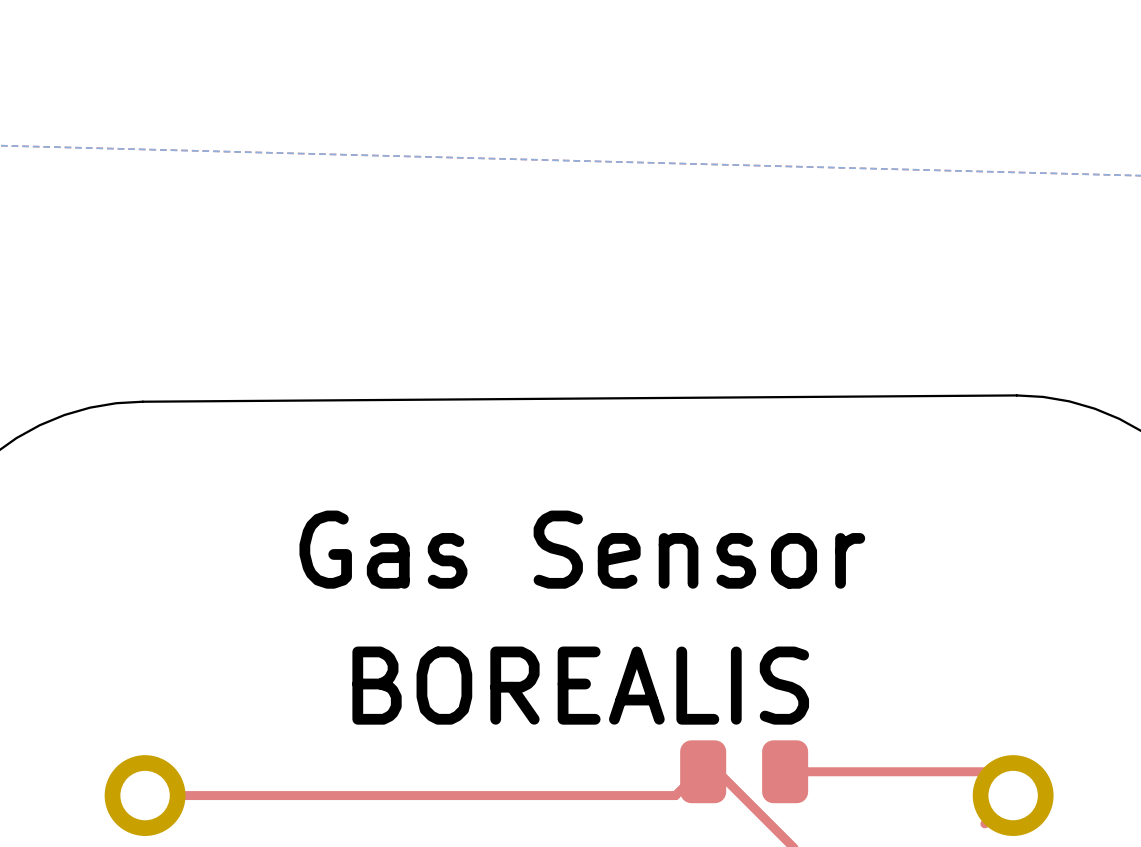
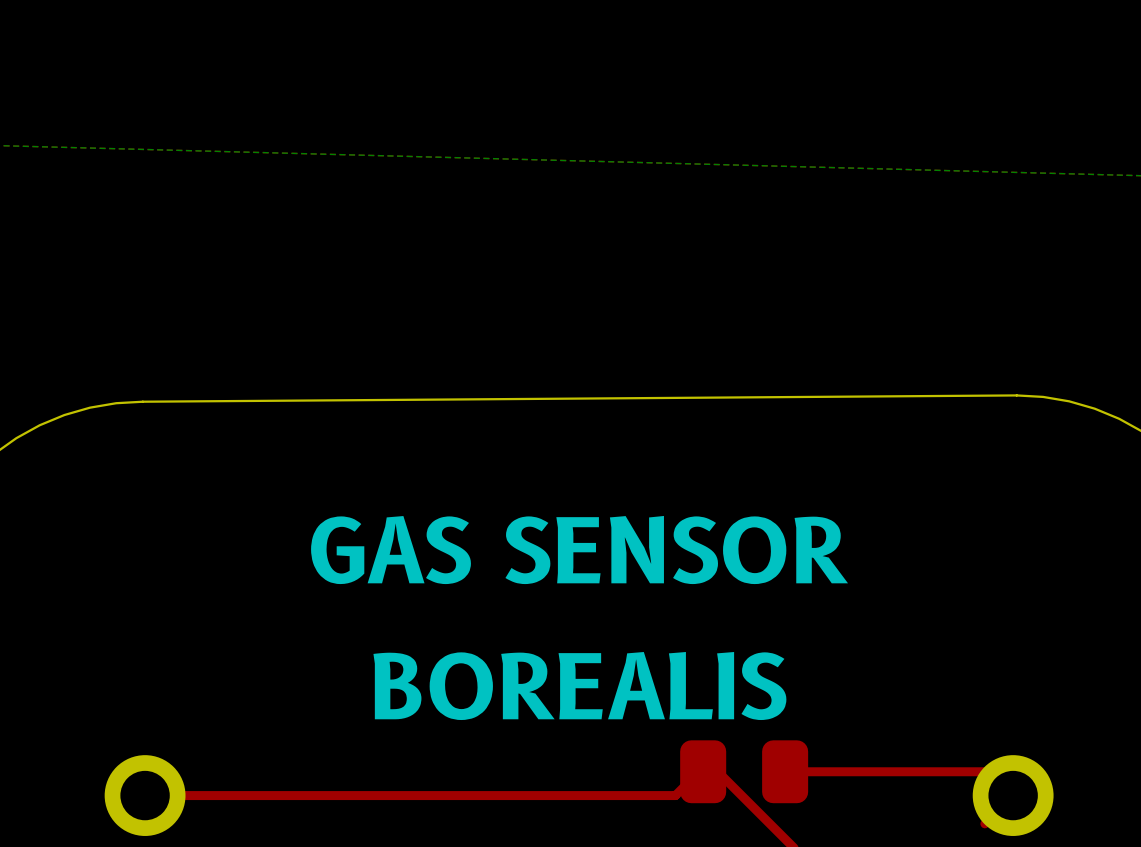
text: Gas Sensor (582, 549) -> GAS SENSOR (579, 550)

